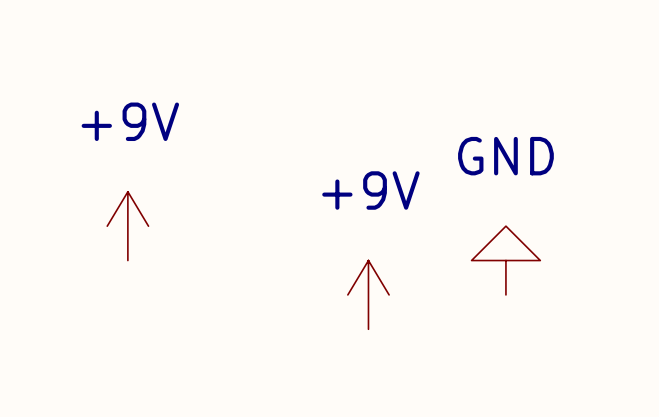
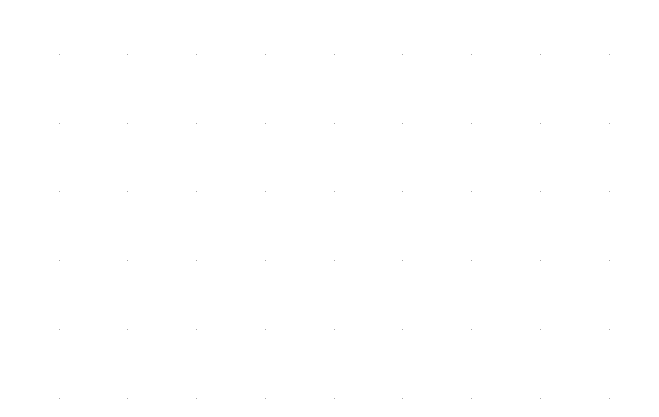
power symbol: +9V (127, 226) -> none
power symbol: GND (505, 260) -> none
power symbol: +9V (368, 294) -> none

